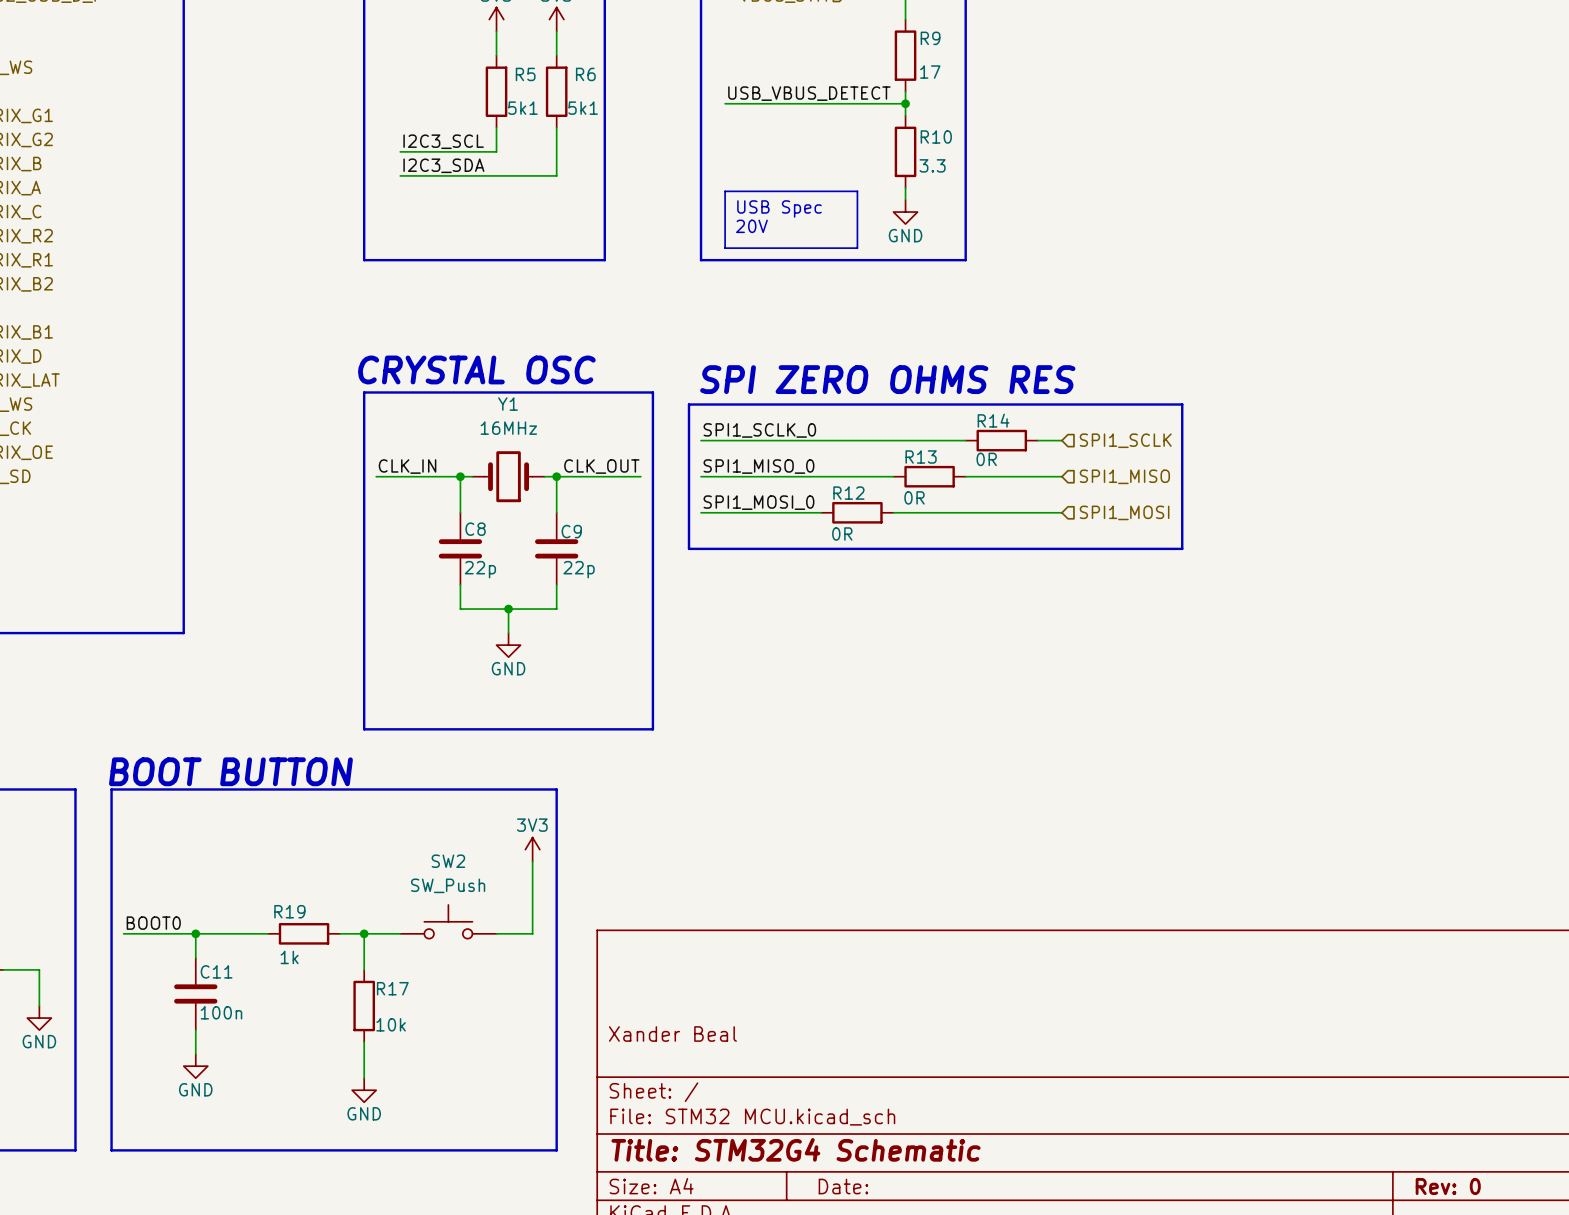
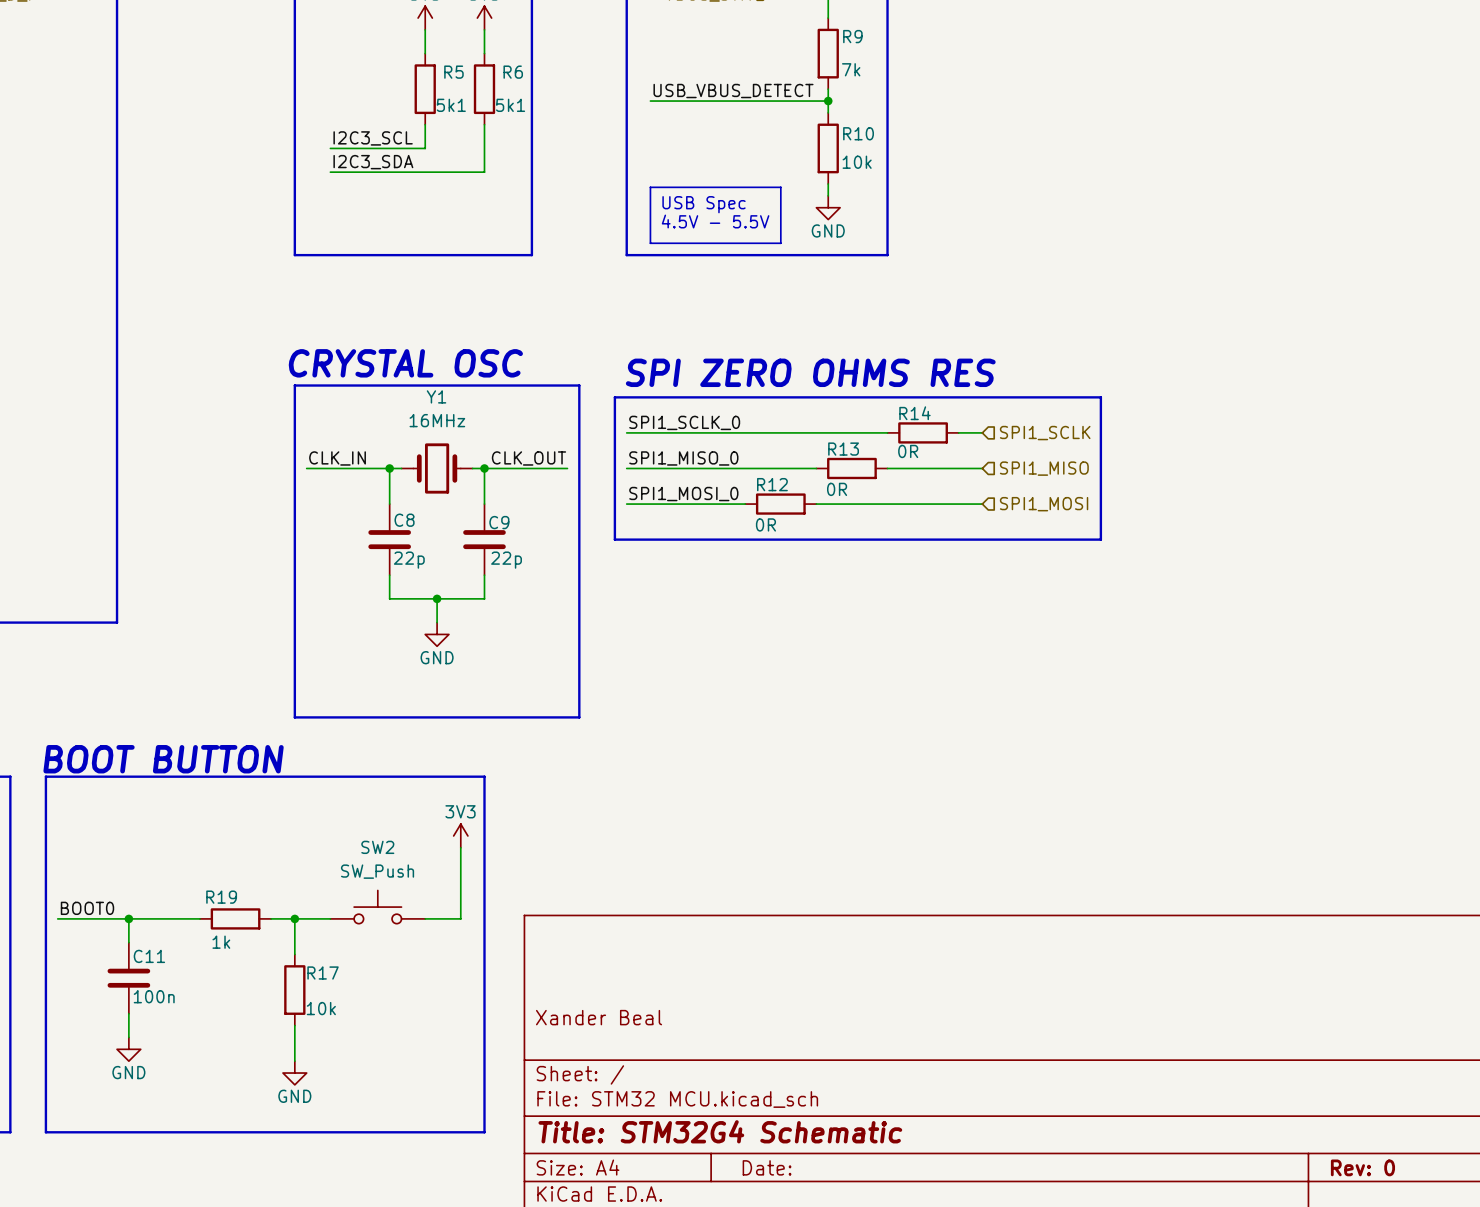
R9 value: 17 (930, 72) -> 7k (851, 69)
R10 value: 3.3 (932, 165) -> 10k (857, 162)
text: 20V (751, 226) -> 4.5V - 5.5V (715, 221)

